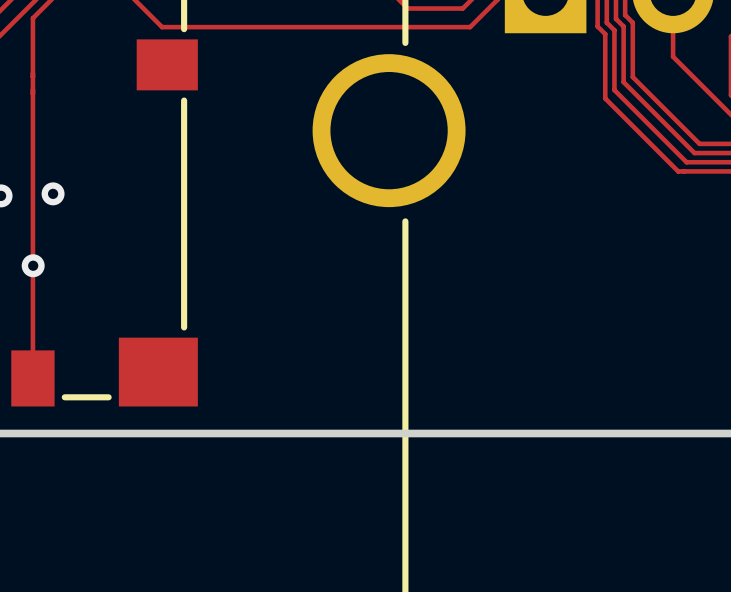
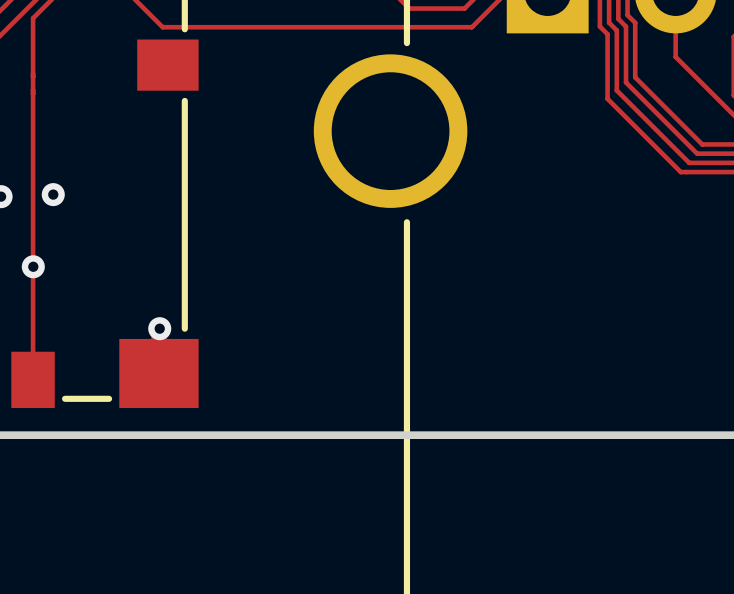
via: none -> (159, 328)

